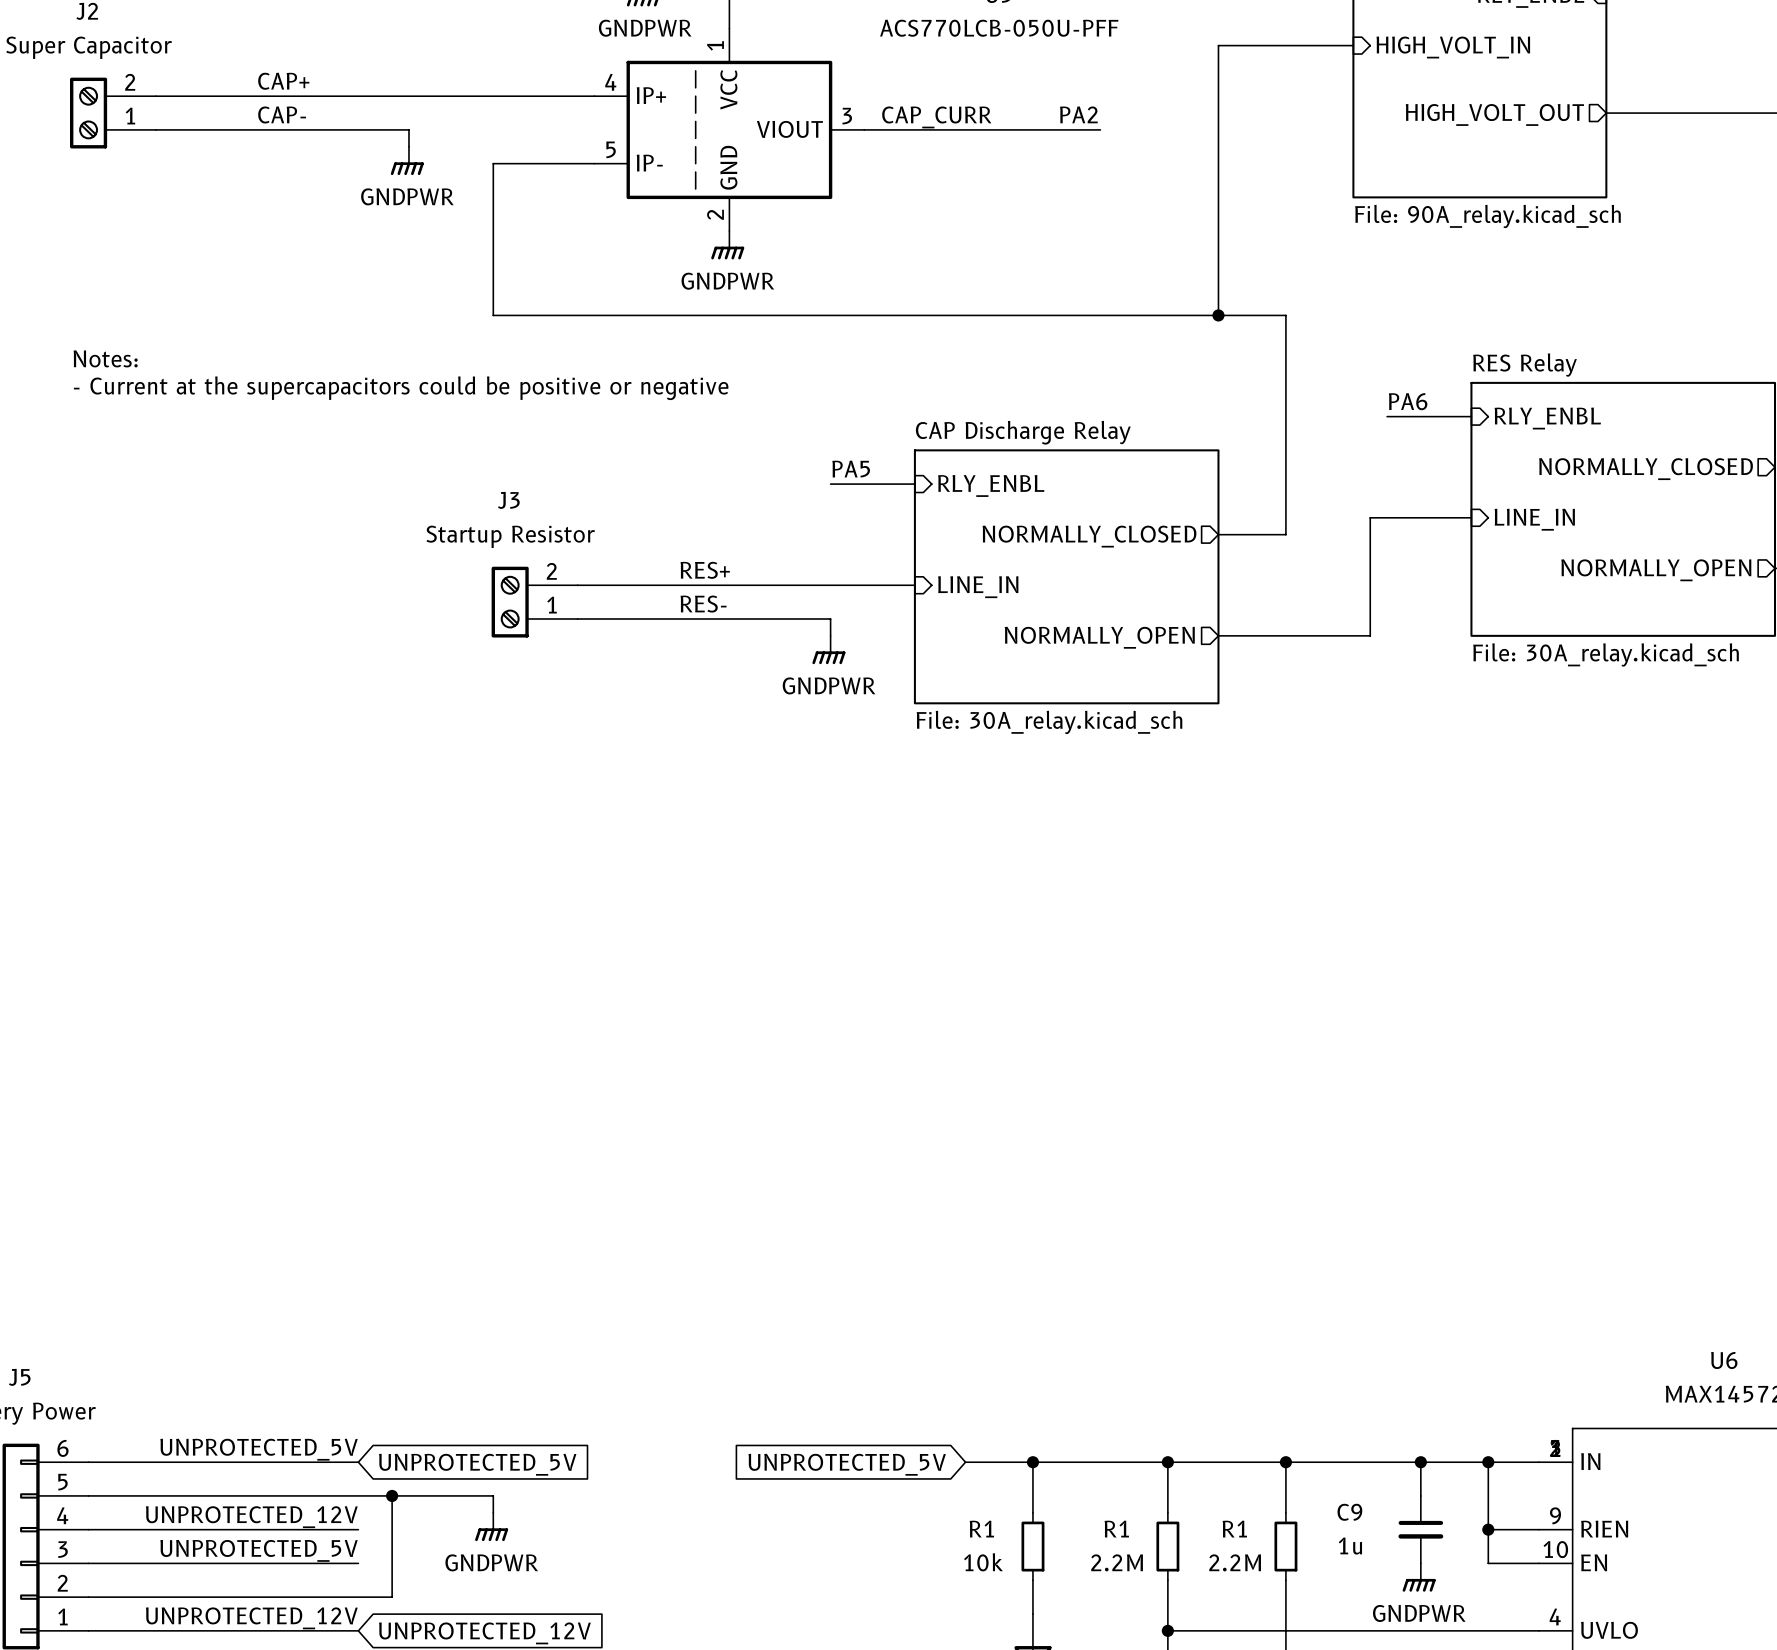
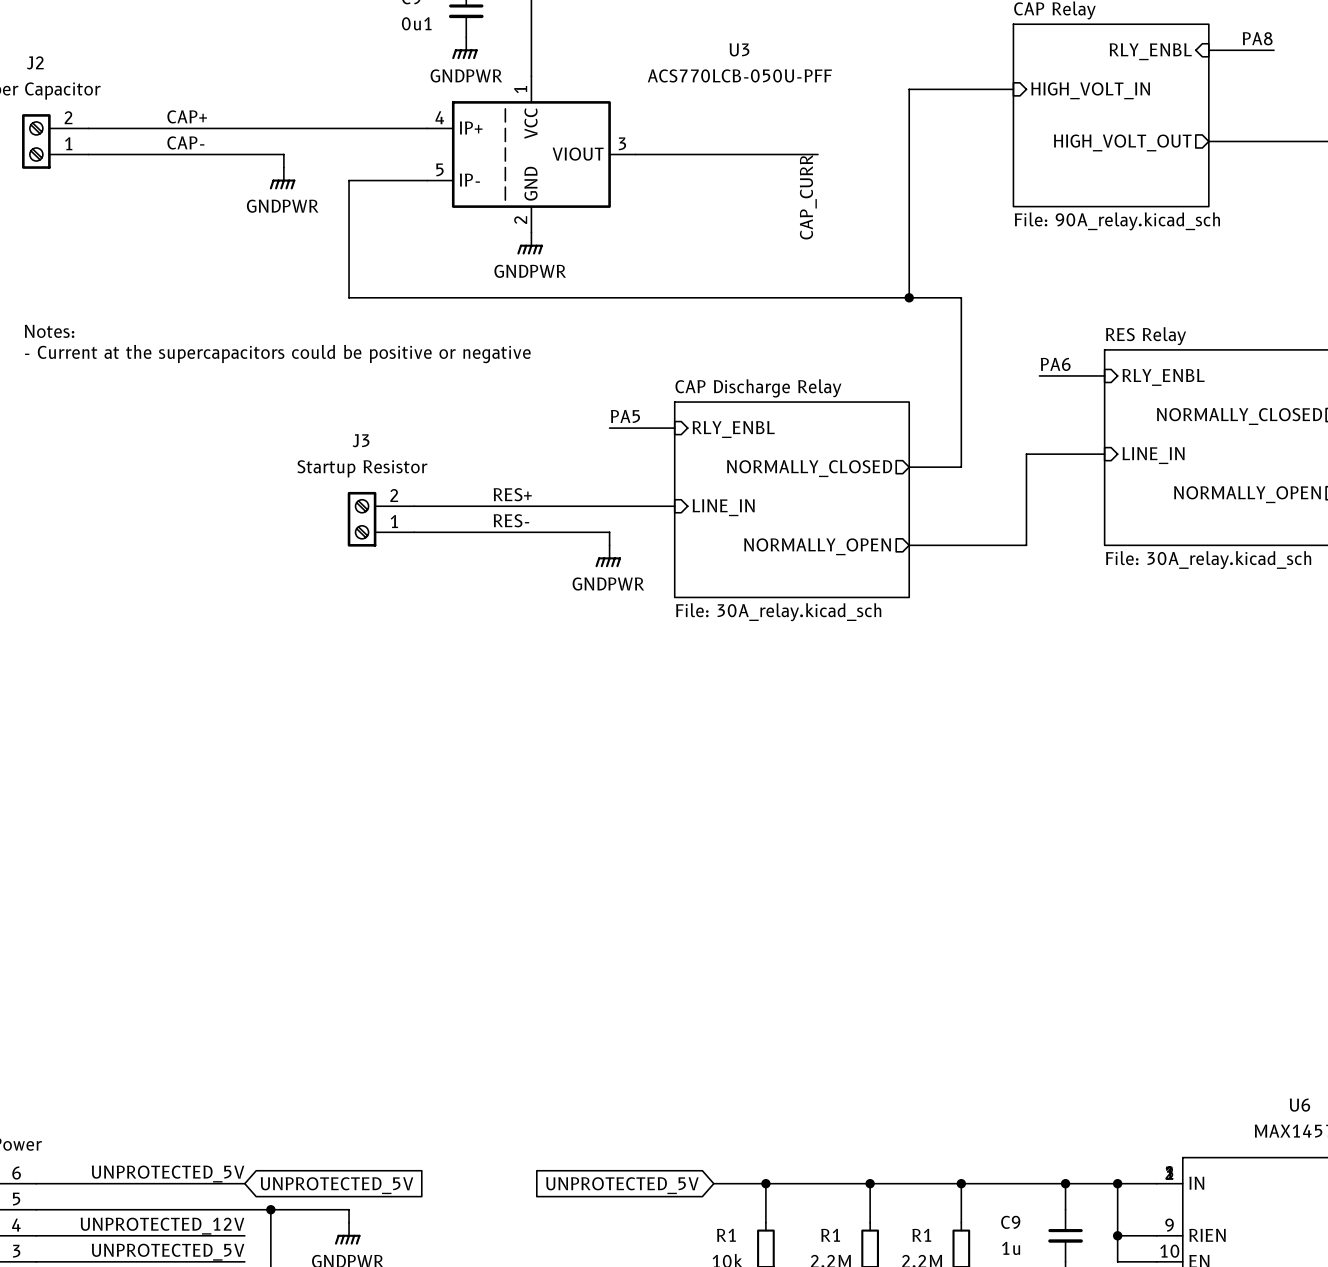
label: PA2 (1078, 114) -> CAP_CURR (808, 197)
label: CAP_CURR (936, 117) -> none

